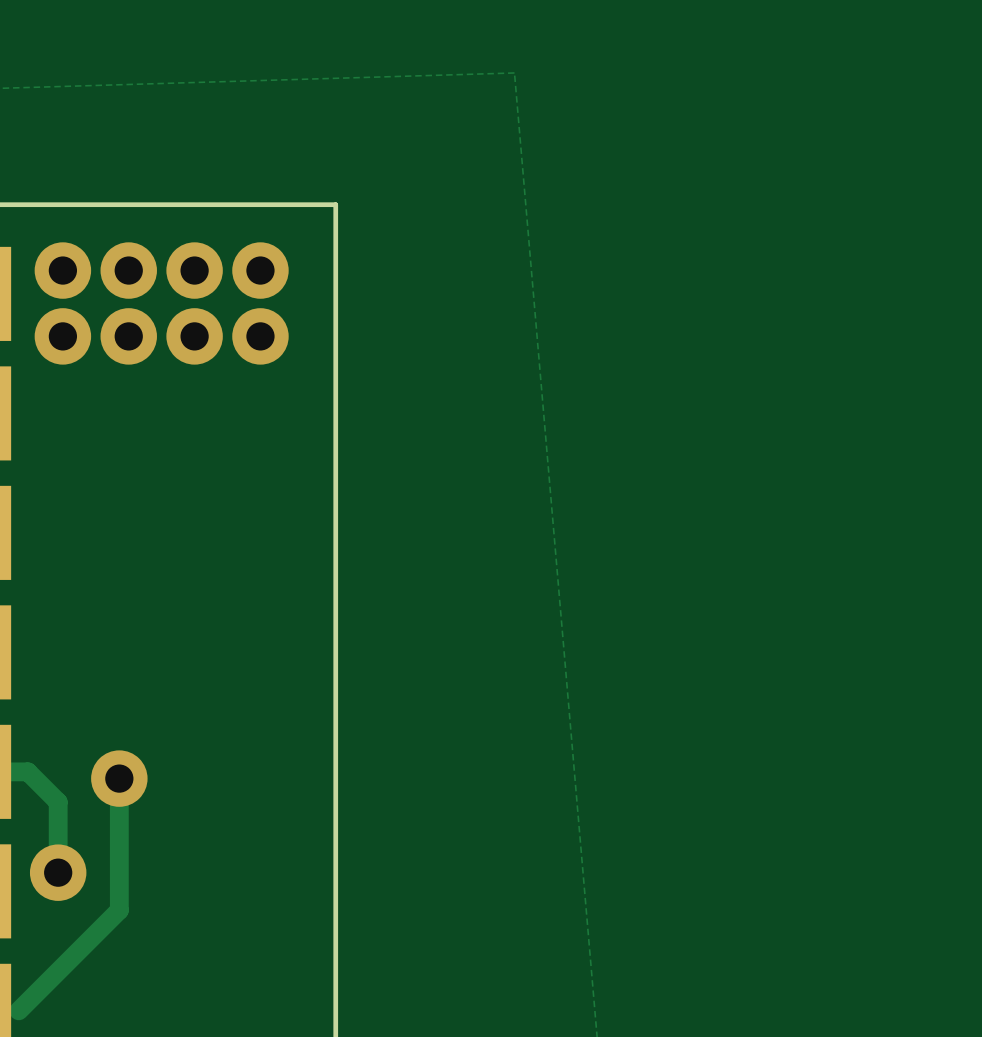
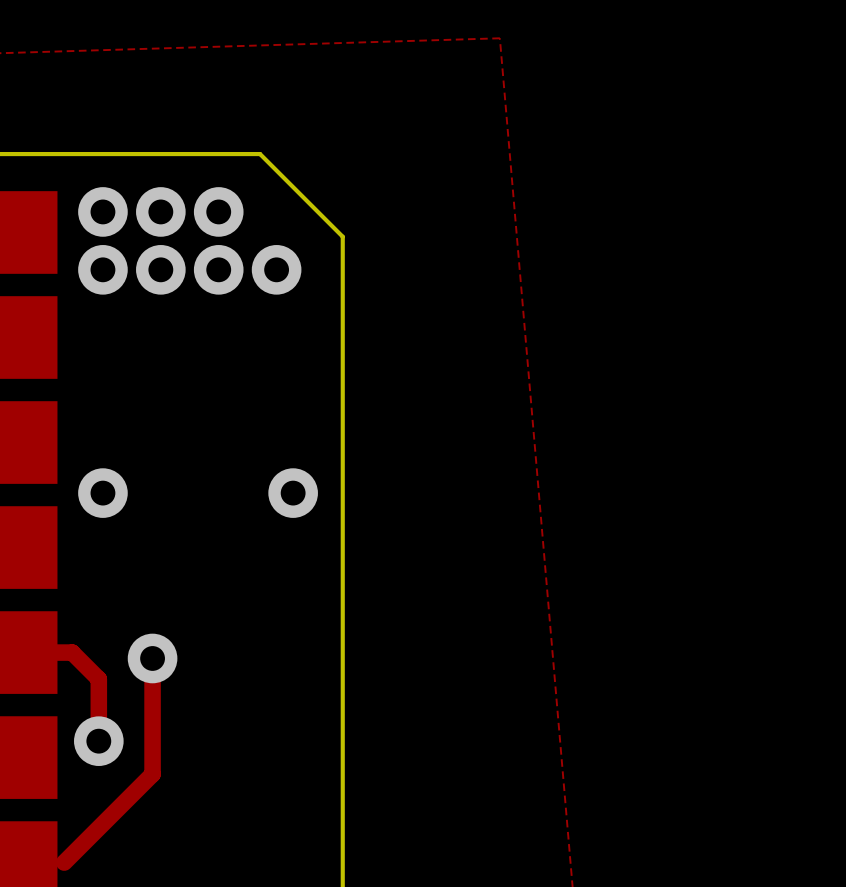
board edge: (241, 204) (335, 204) (335, 298) -> (260, 154) (342, 236)
via: (260, 270) -> none
via: none -> (102, 493)
via: none -> (293, 493)

